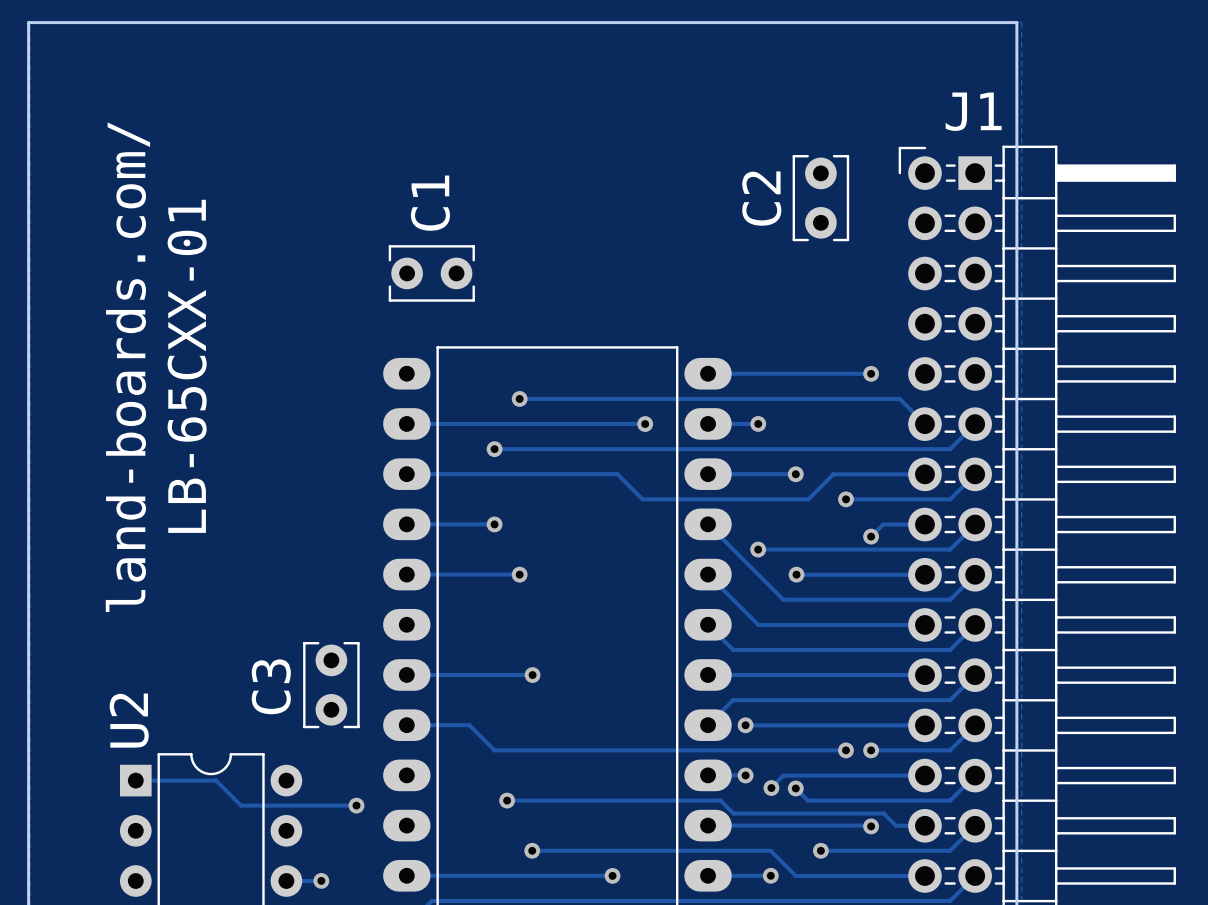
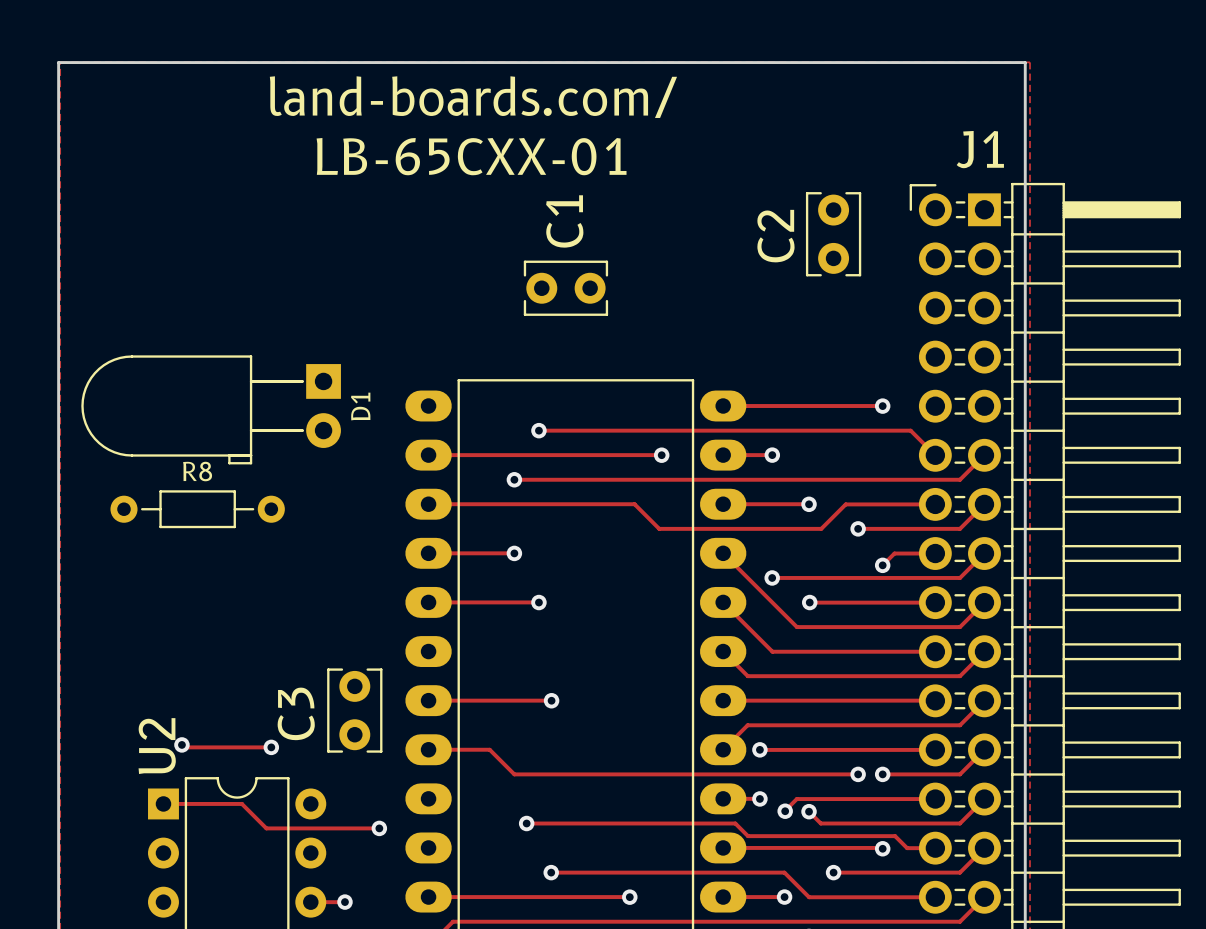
C1 position: (431, 273) -> (565, 288)
text rotation: 0° (187, 366) -> 90° clockwise (471, 156)
text rotation: 0° (127, 367) -> 90° clockwise (473, 97)
D1: none -> (211, 409)
R8: none -> (197, 509)
track: none -> (181, 744) (184, 747) (271, 747)
via: none -> (181, 744)
via: none -> (271, 747)

